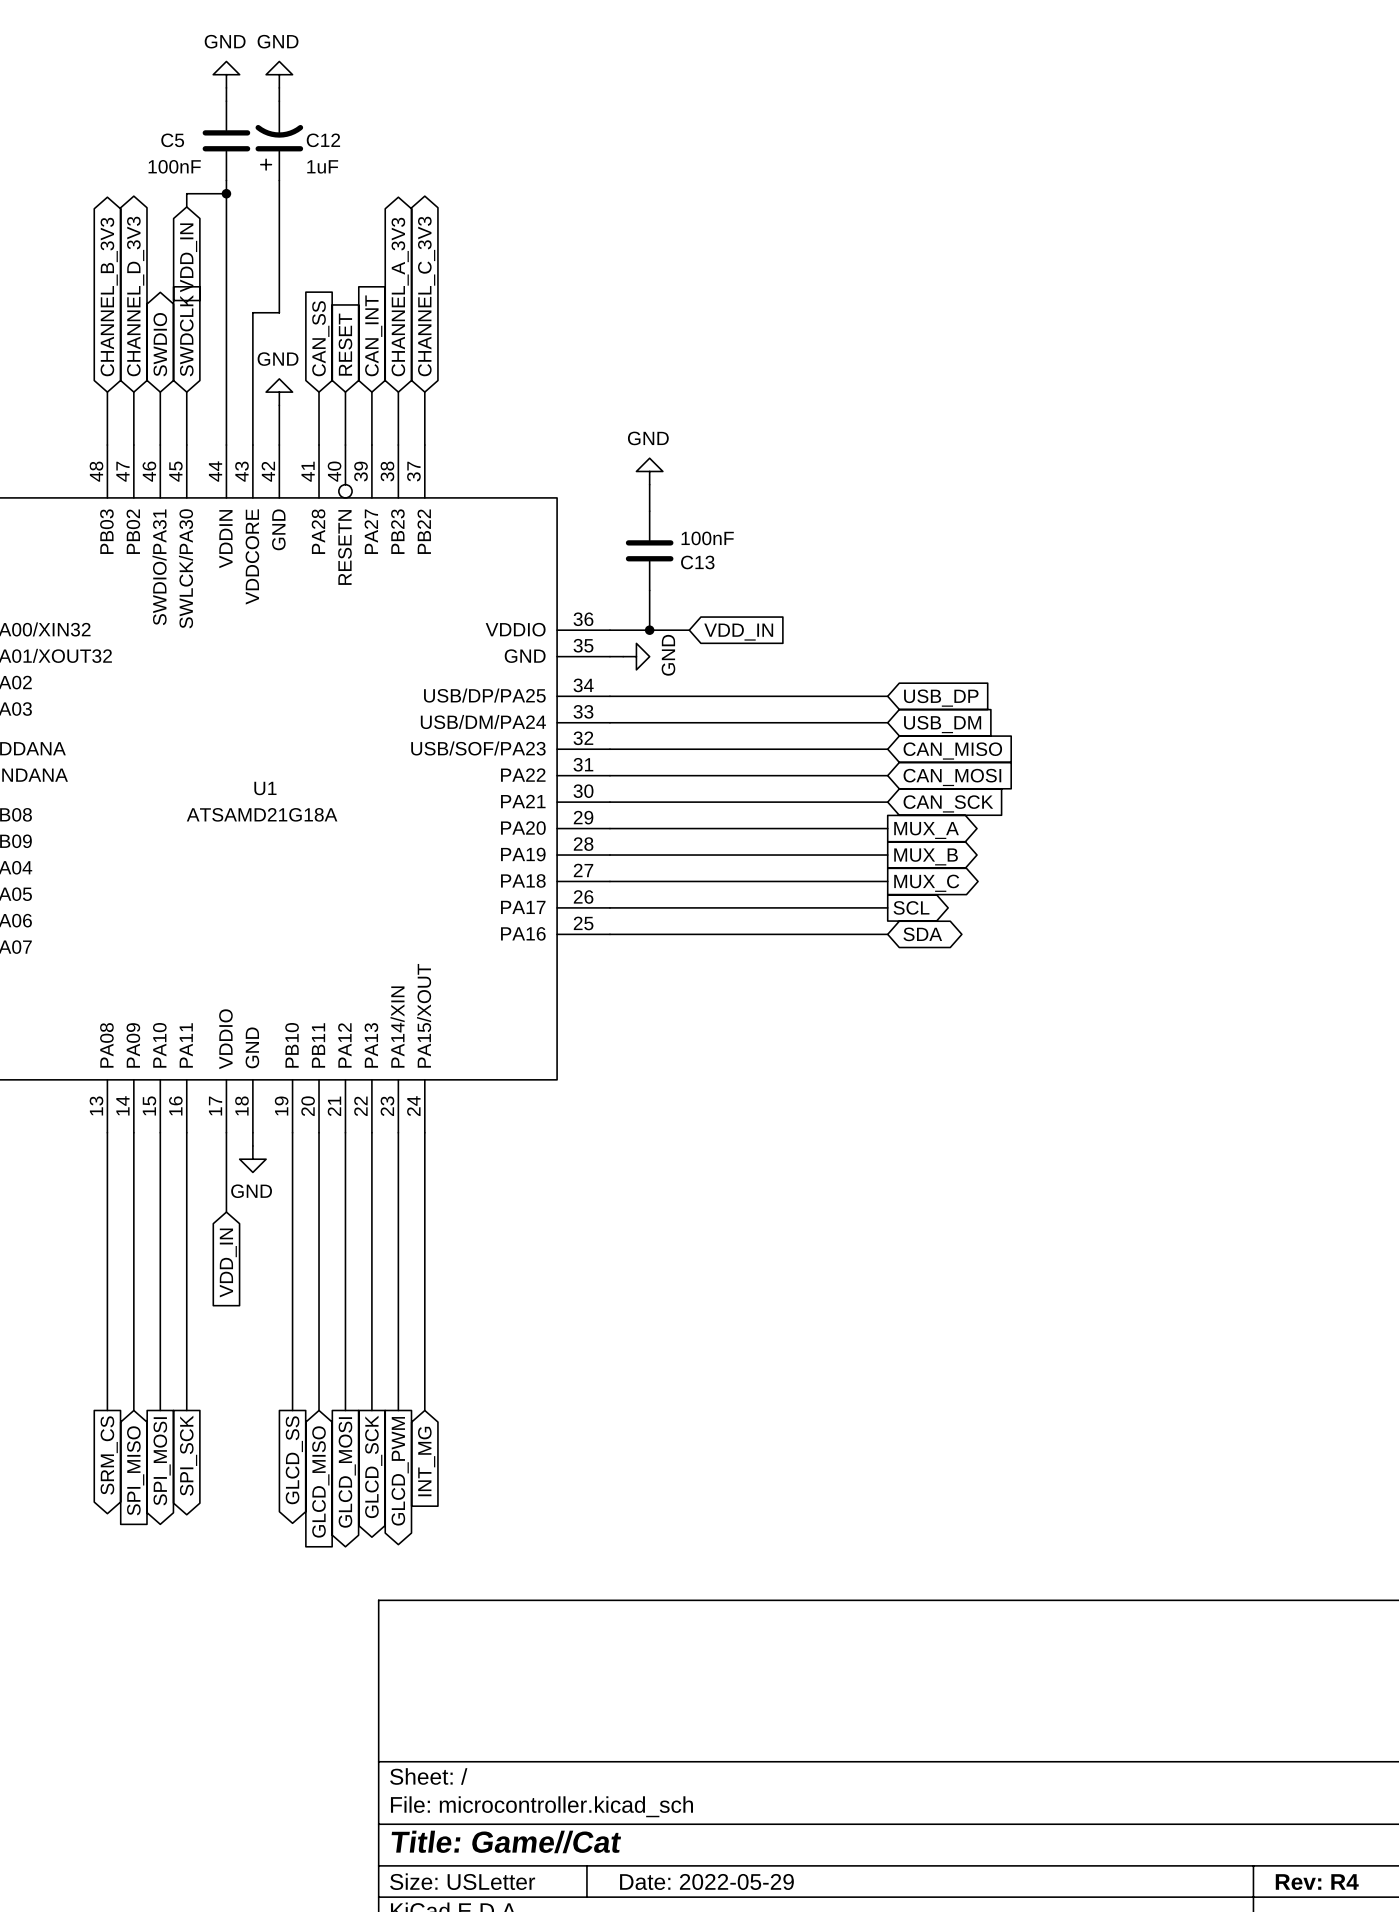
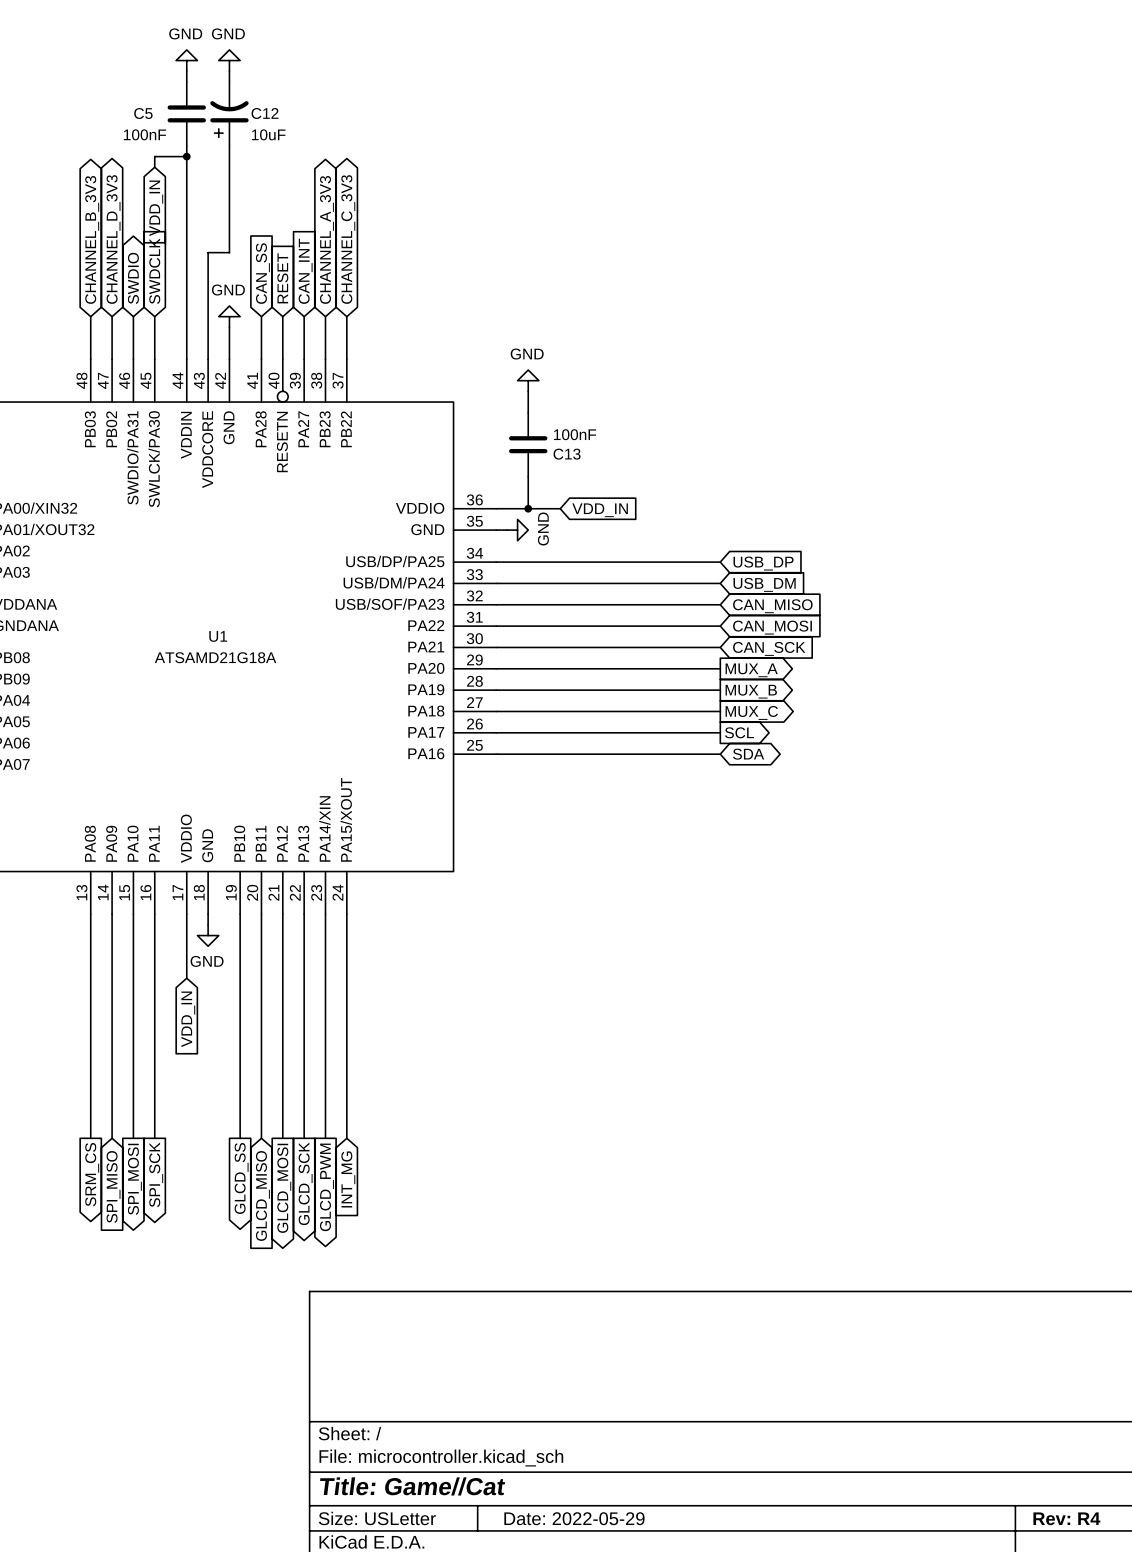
C12 value: 1uF (322, 166) -> 10uF (268, 134)

